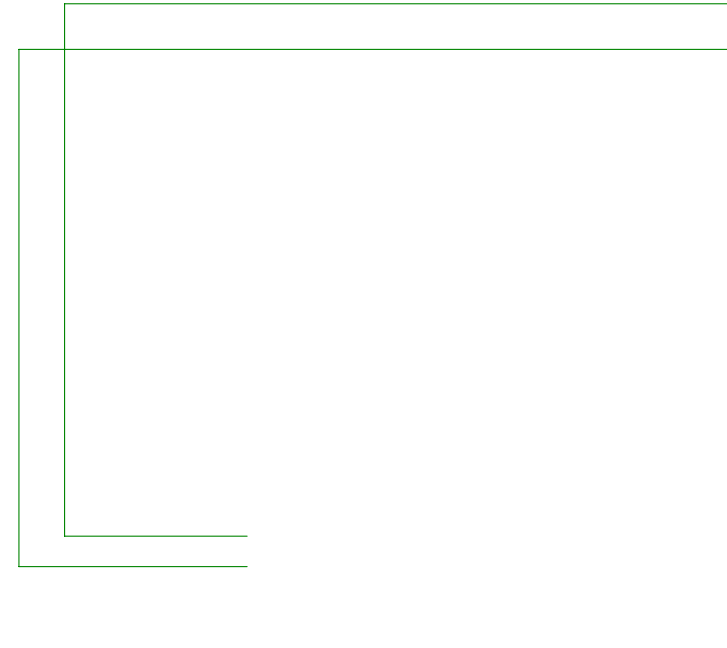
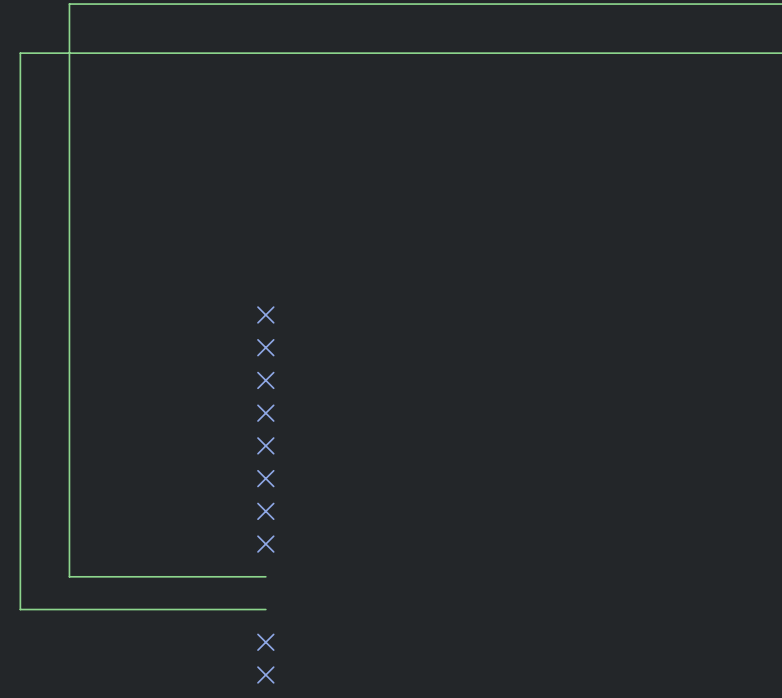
no-connect mark: none -> (265, 314)
no-connect mark: none -> (265, 347)
no-connect mark: none -> (265, 380)
no-connect mark: none -> (265, 413)
no-connect mark: none -> (265, 445)
no-connect mark: none -> (265, 478)
no-connect mark: none -> (265, 511)
no-connect mark: none -> (265, 544)
no-connect mark: none -> (265, 642)
no-connect mark: none -> (265, 674)

